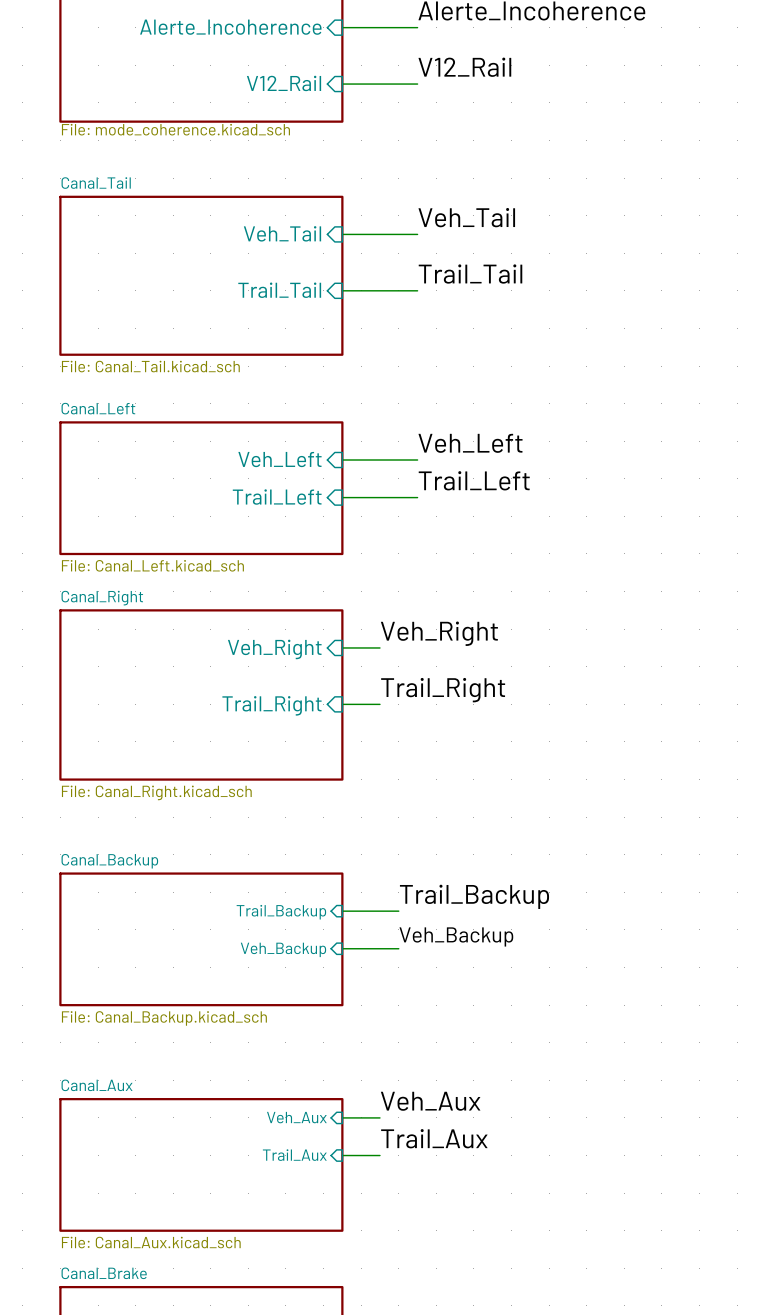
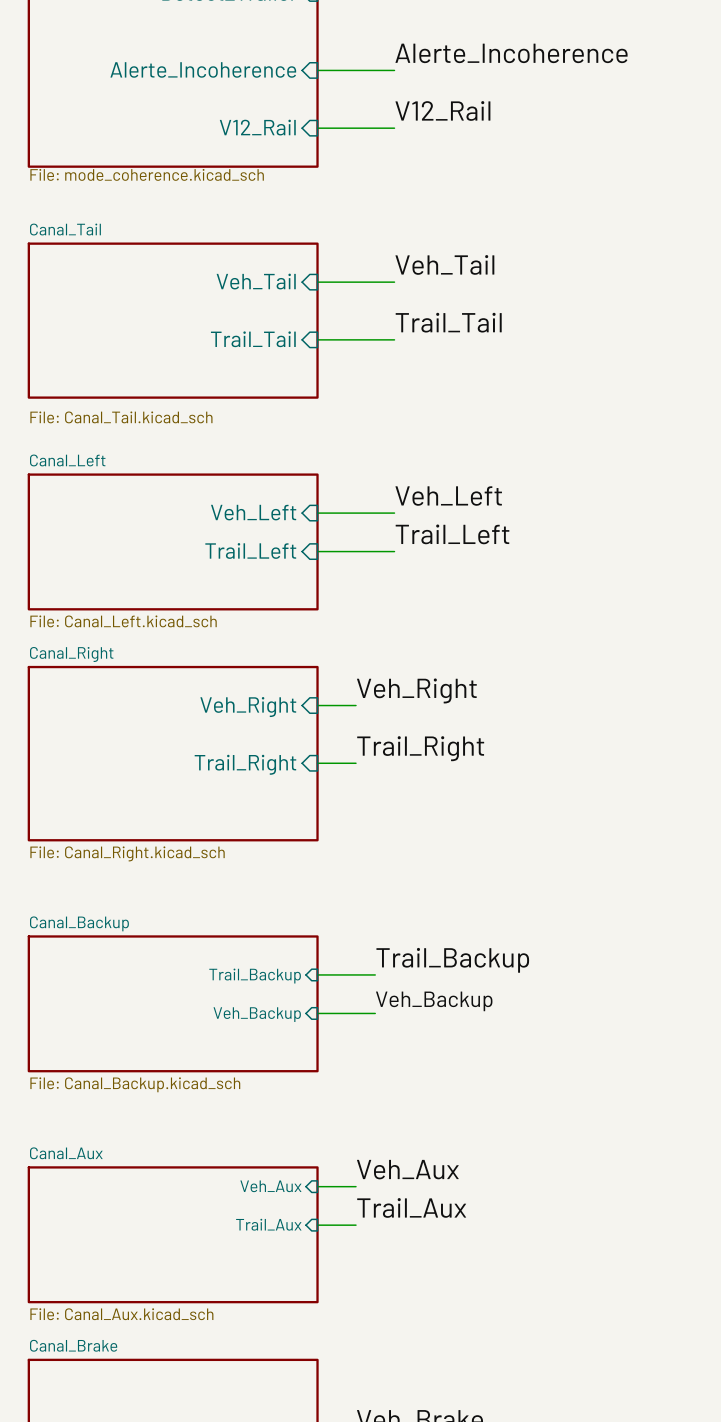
sheet Canal_Tail shape: [59, 195, 344, 356] -> [27, 242, 319, 399]

